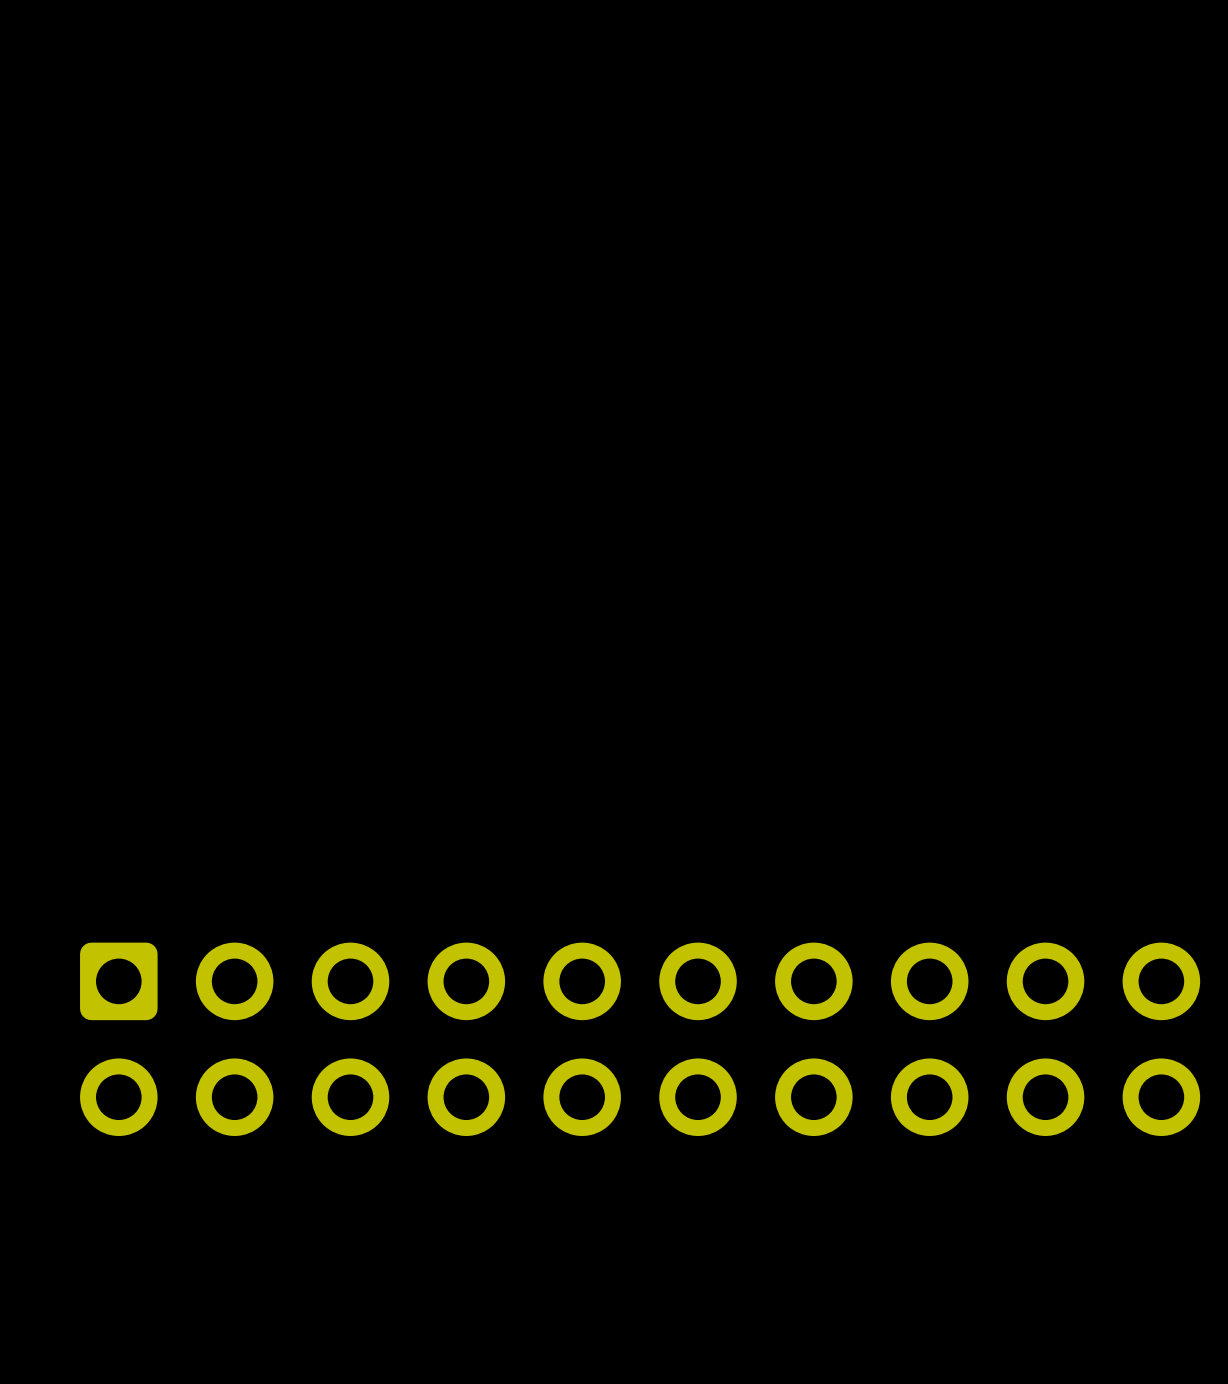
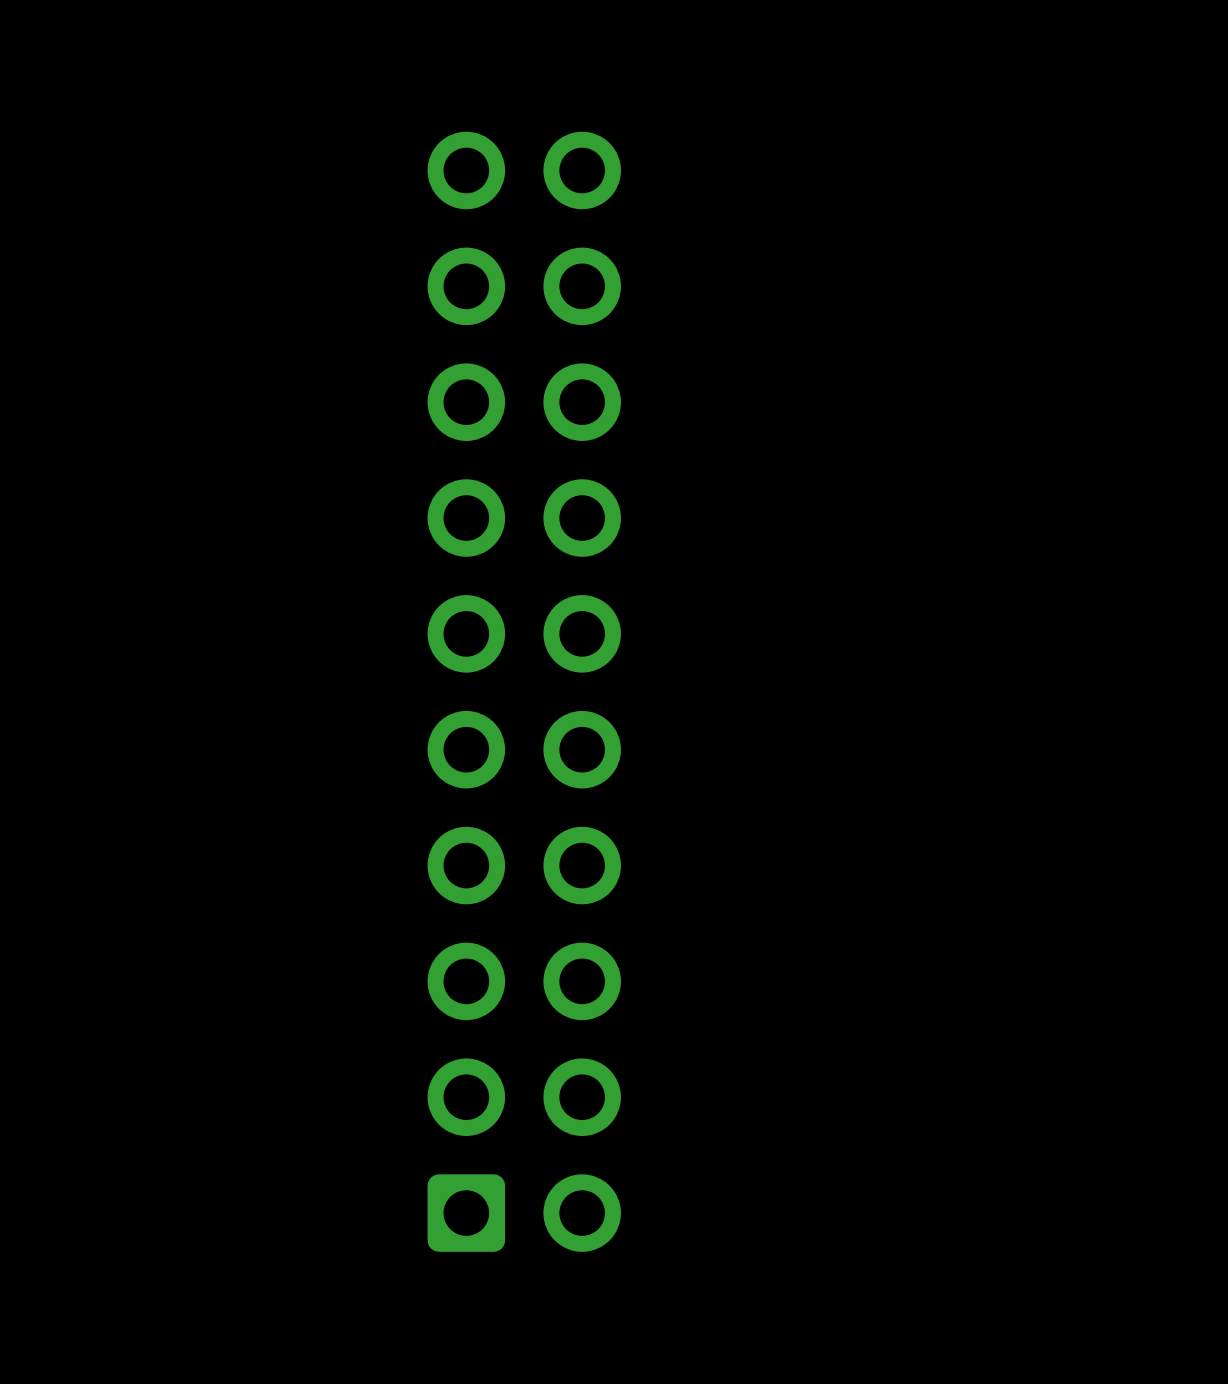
part rotation: 0° (640, 1039) -> 90° counterclockwise (524, 691)

